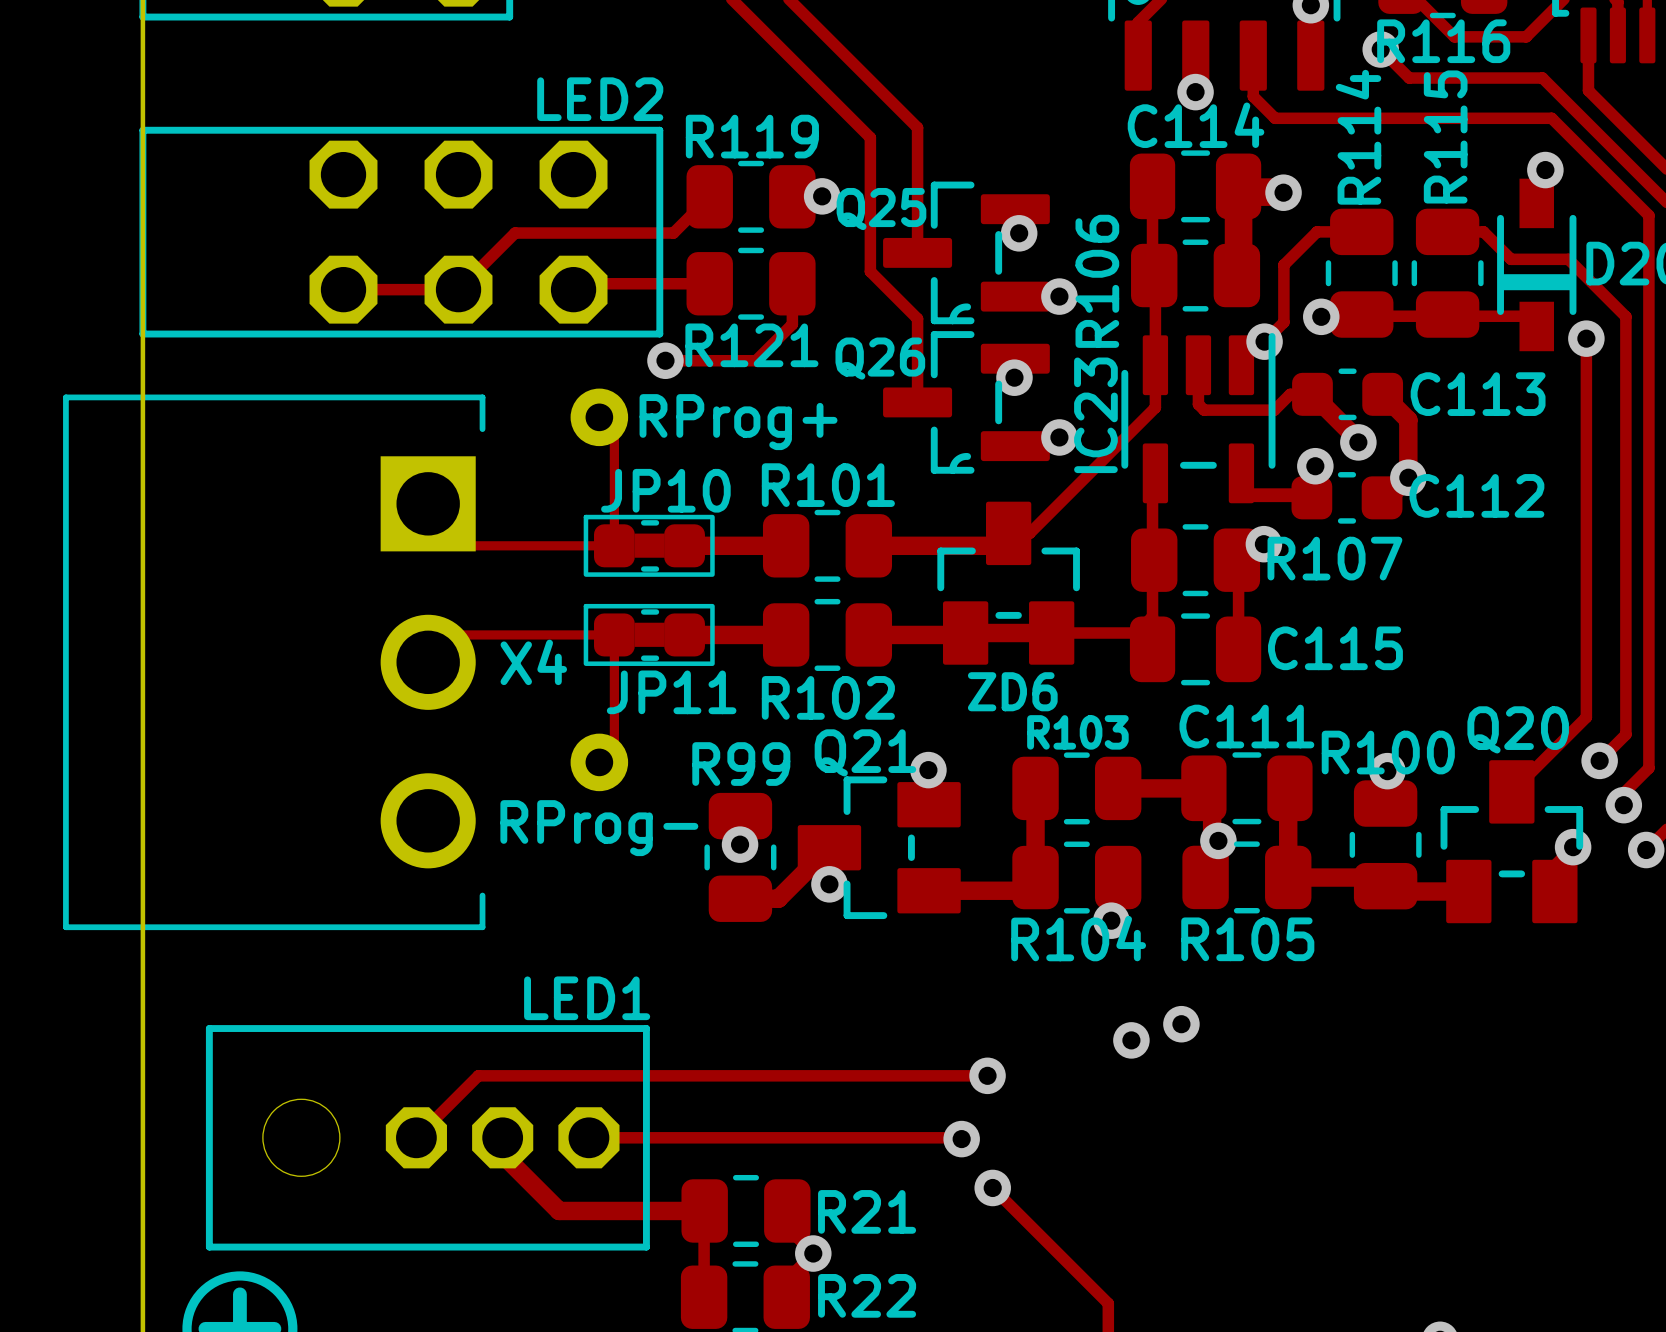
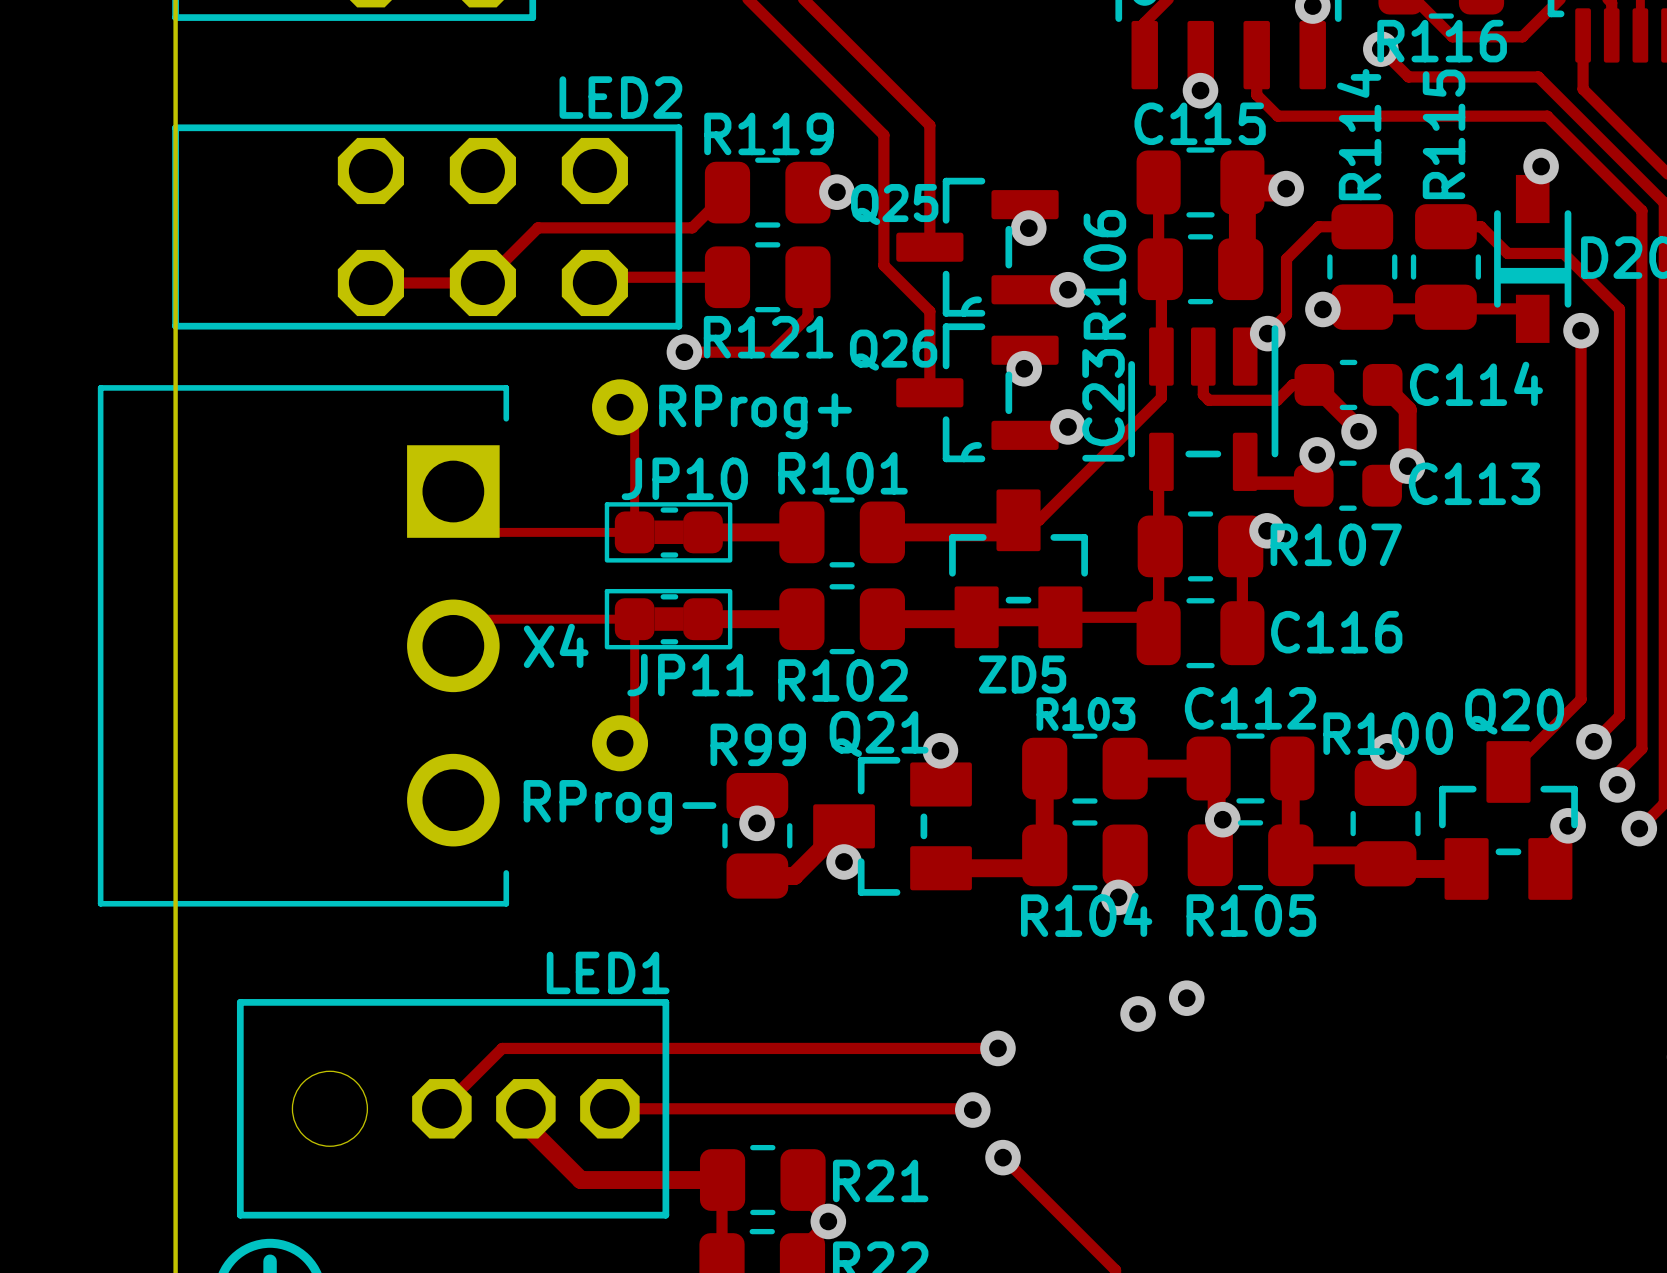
C114 name: C114 (1196, 125) -> C115 (1200, 123)
C113 name: C113 (1478, 394) -> C114 (1476, 383)
C112 name: C112 (1476, 495) -> C113 (1474, 483)
C115 name: C115 (1335, 648) -> C116 (1336, 632)
ZD6 name: ZD6 (1012, 691) -> ZD5 (1022, 674)
C111 name: C111 (1246, 726) -> C112 (1250, 708)

